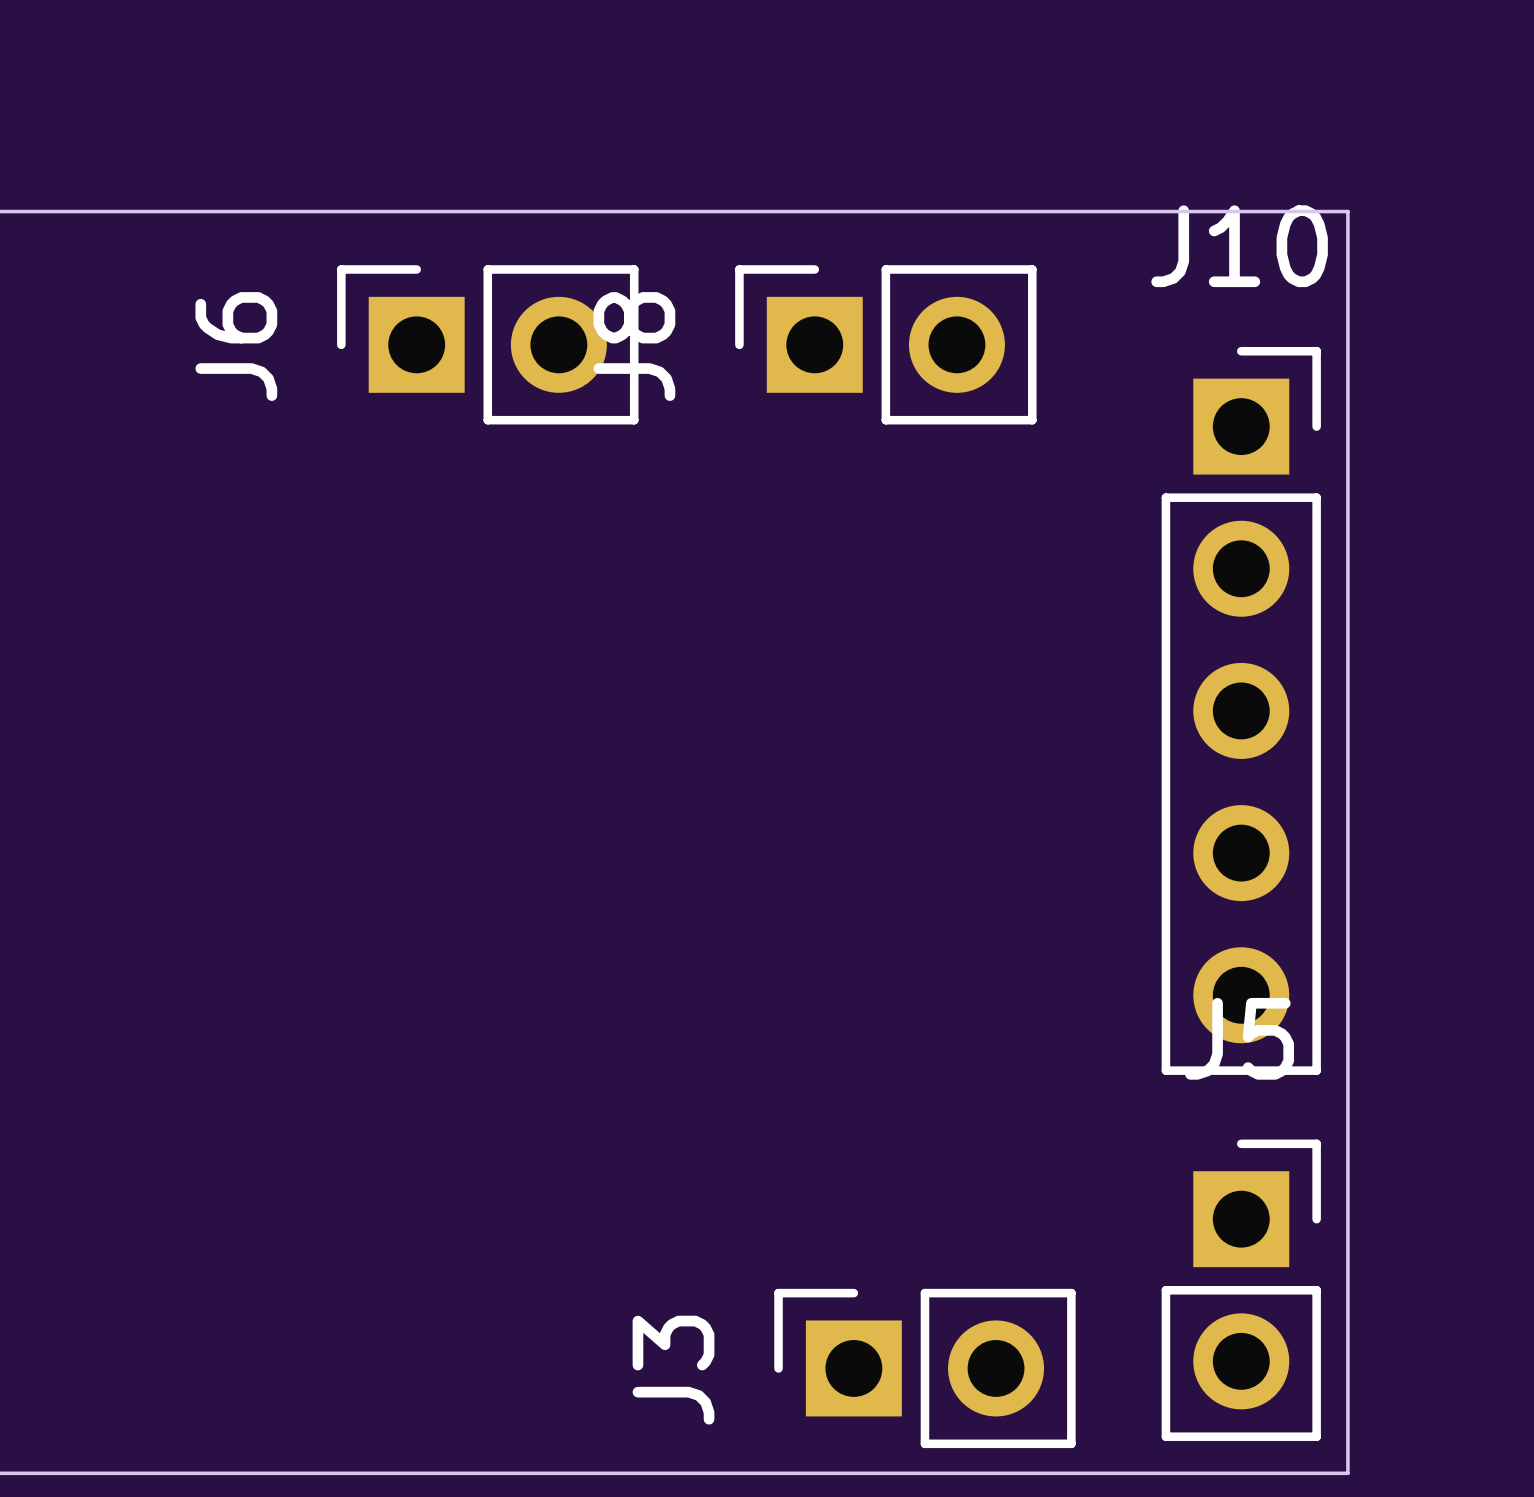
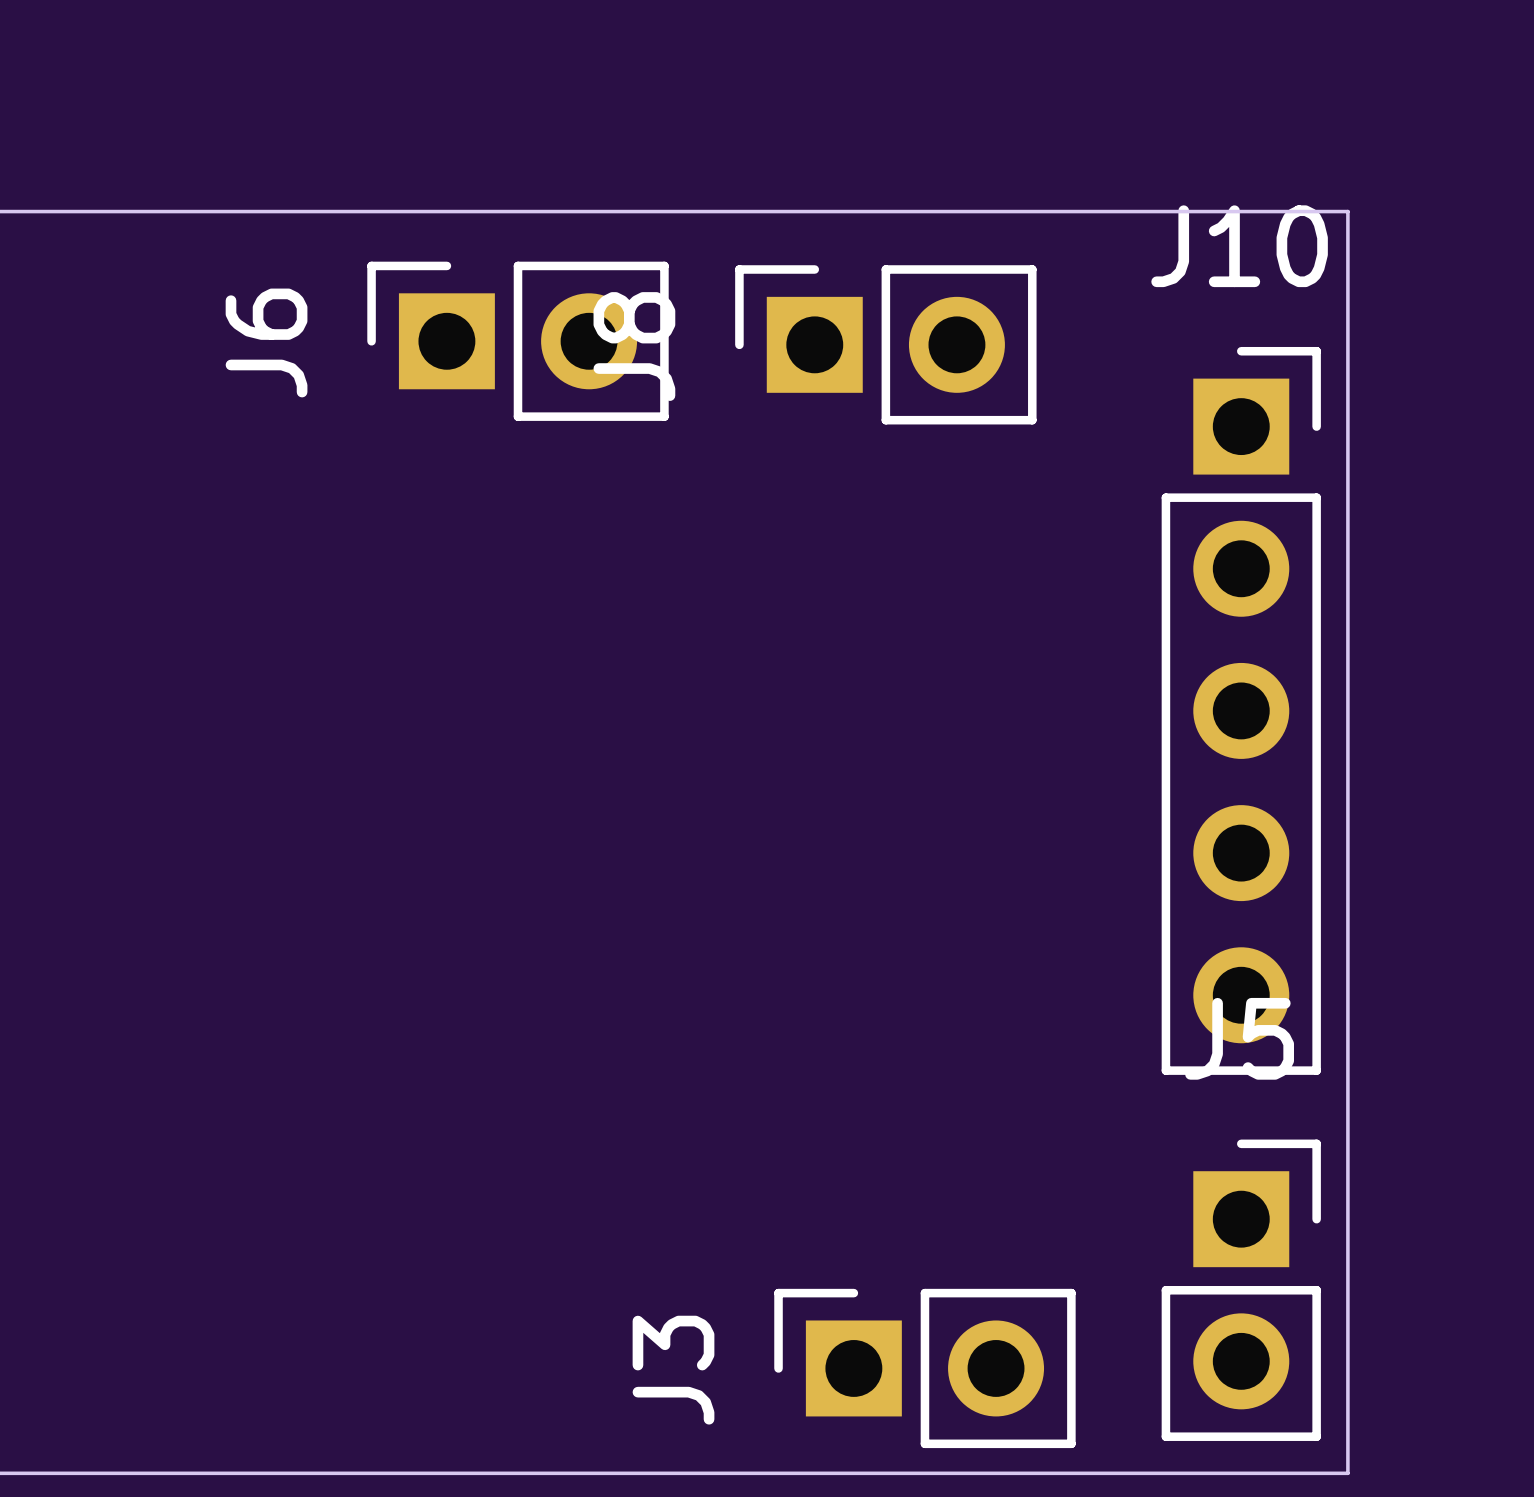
J6 position: (487, 344) -> (517, 341)

